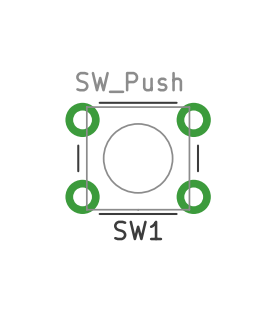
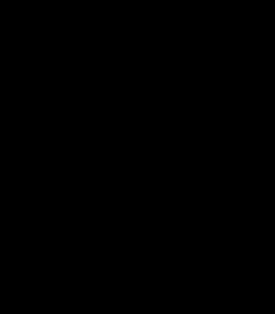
SW1: SW_Push (138, 158) -> none

